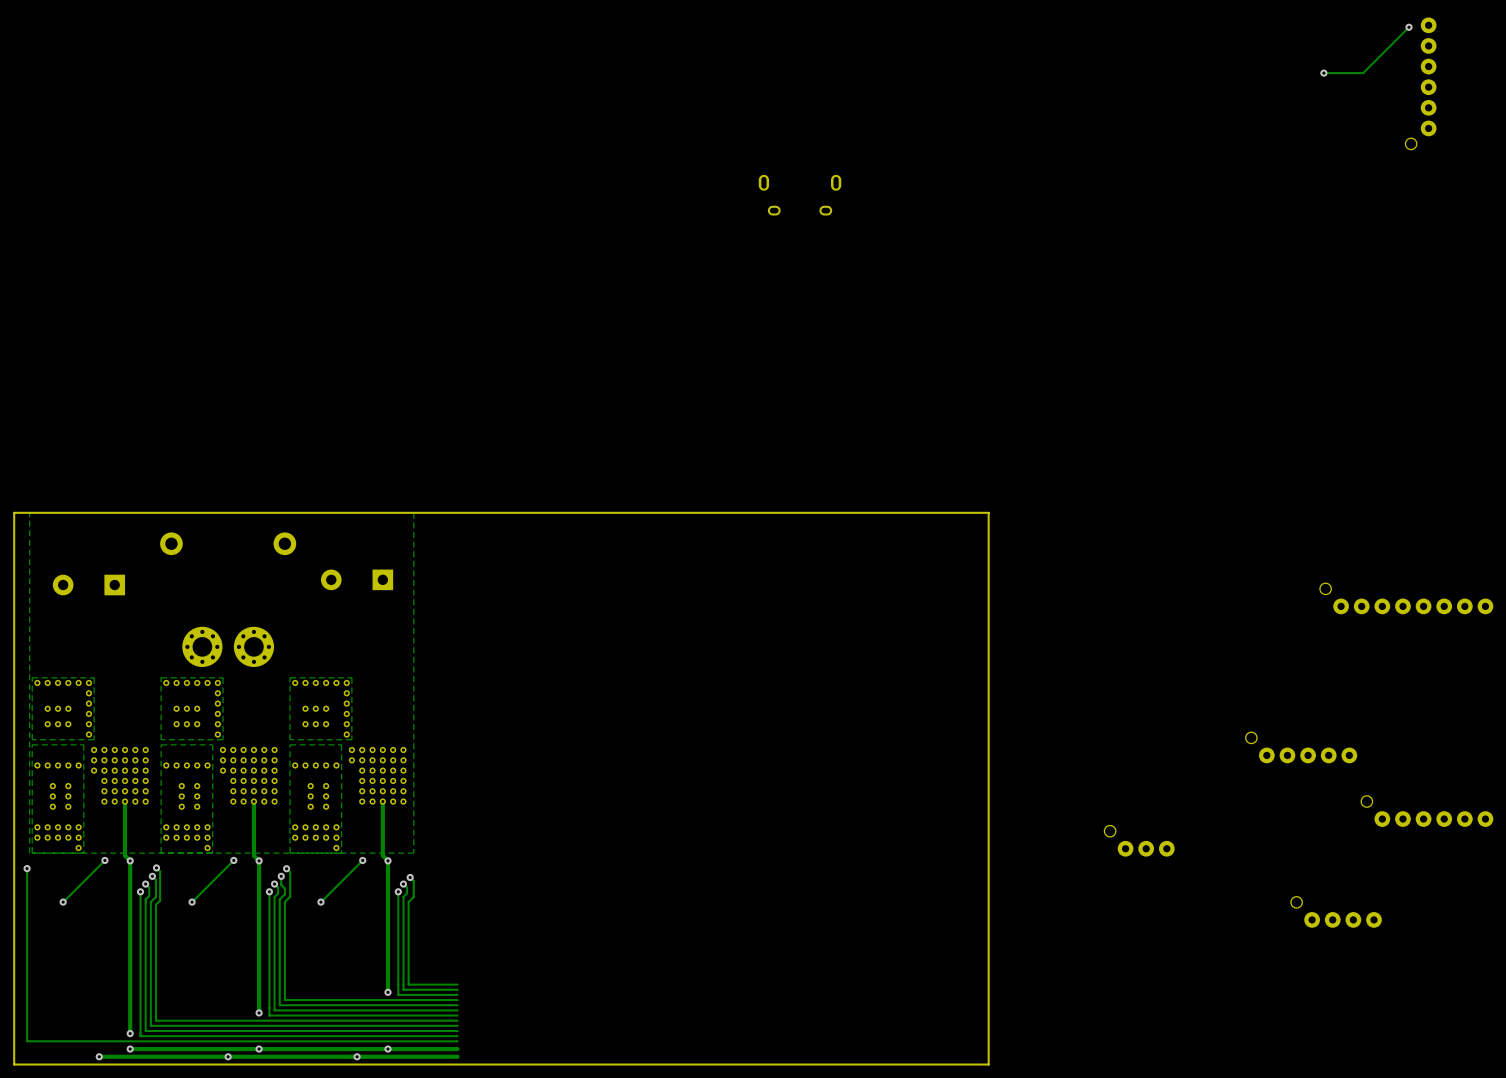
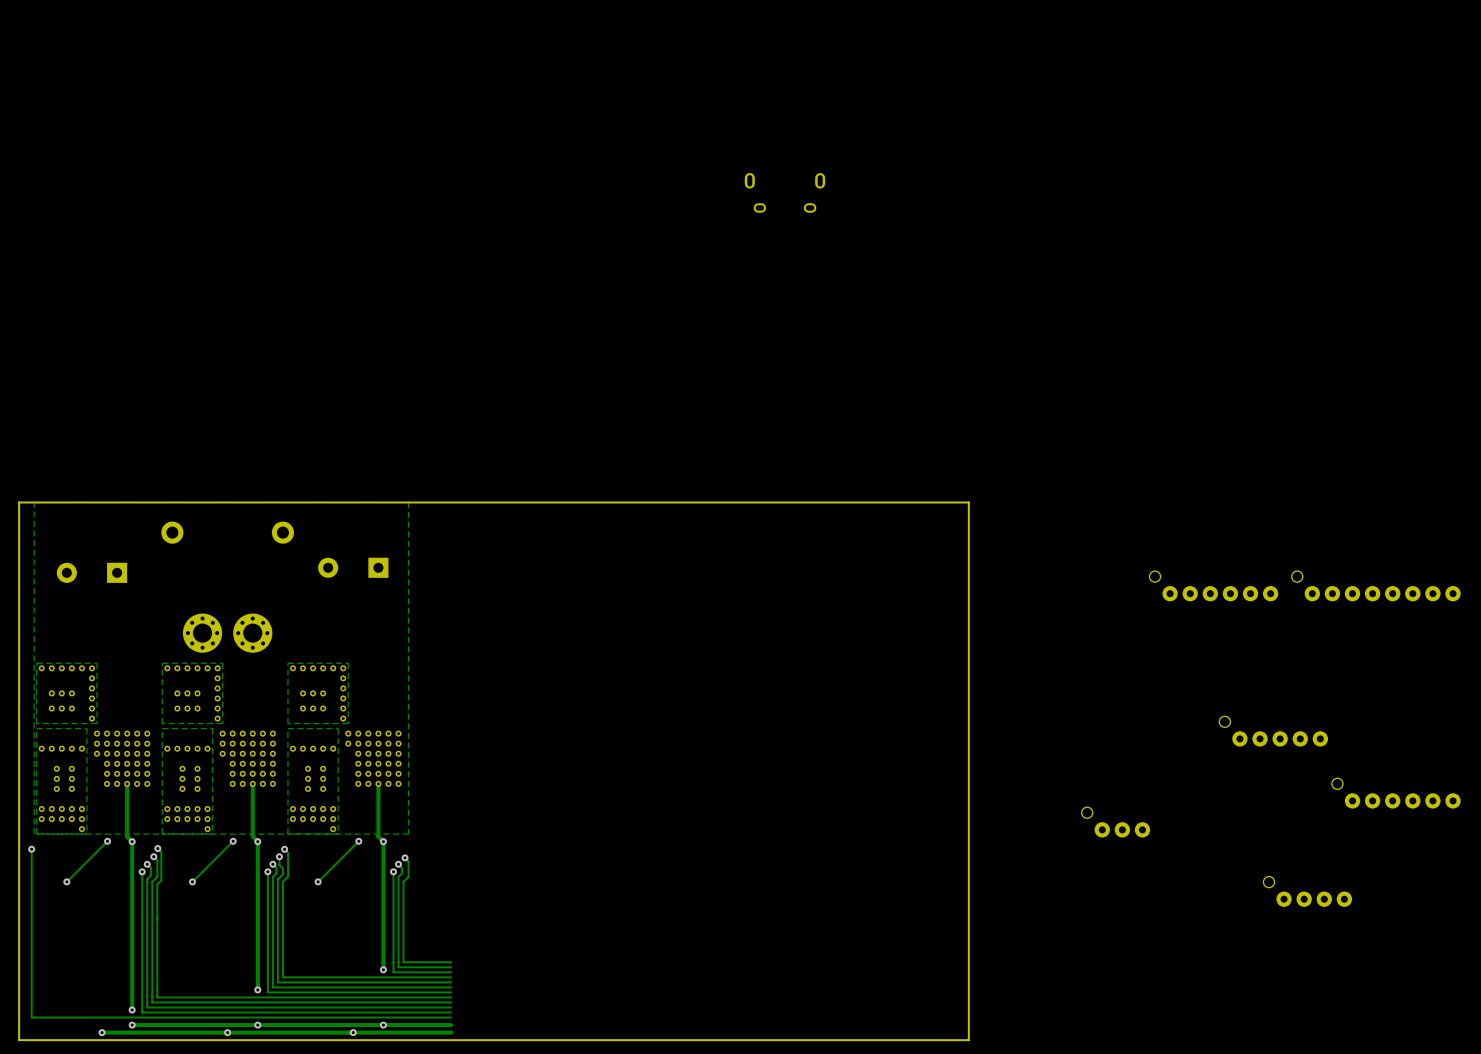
track: (1409, 27) (1363, 73) (1323, 73) -> none
via: (1409, 27) -> none
via: (1323, 73) -> none
part: (1420, 83) -> none
part: none -> (1213, 586)

